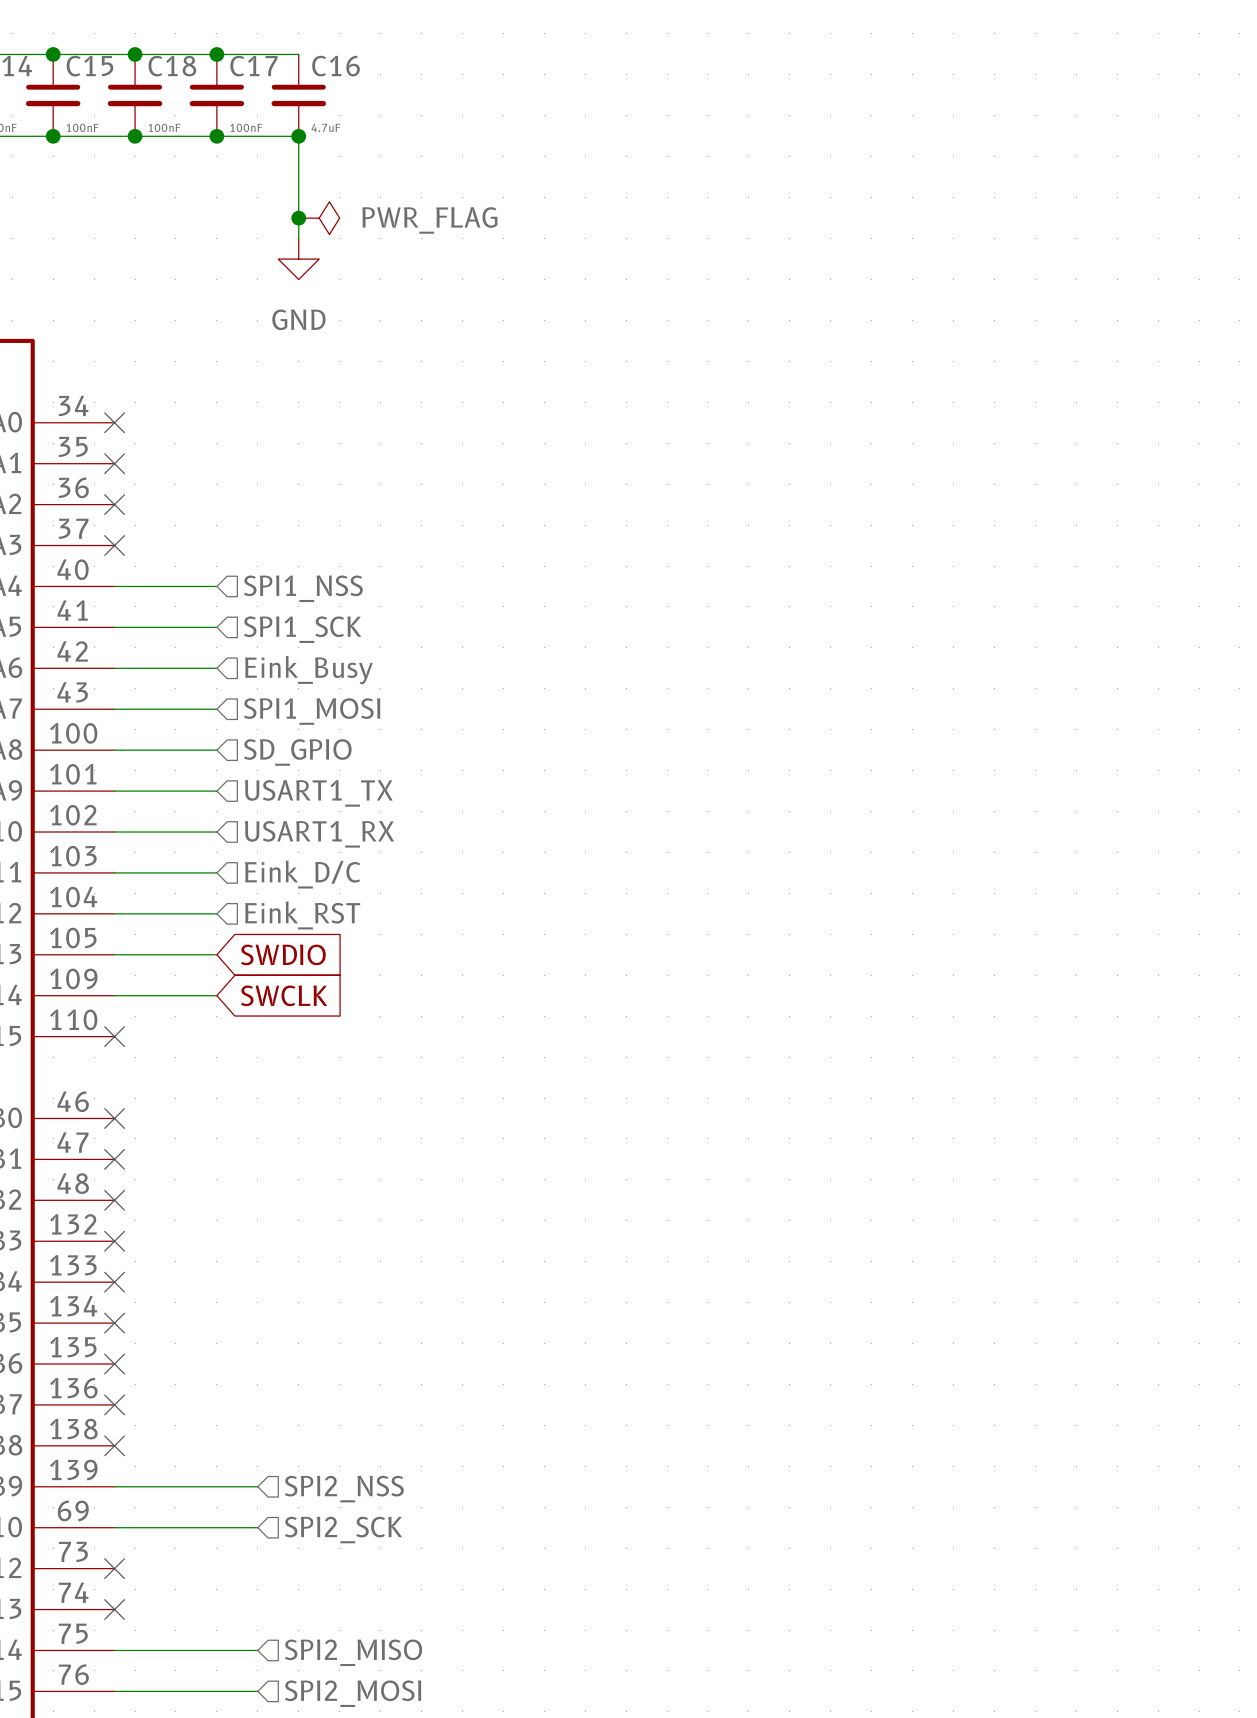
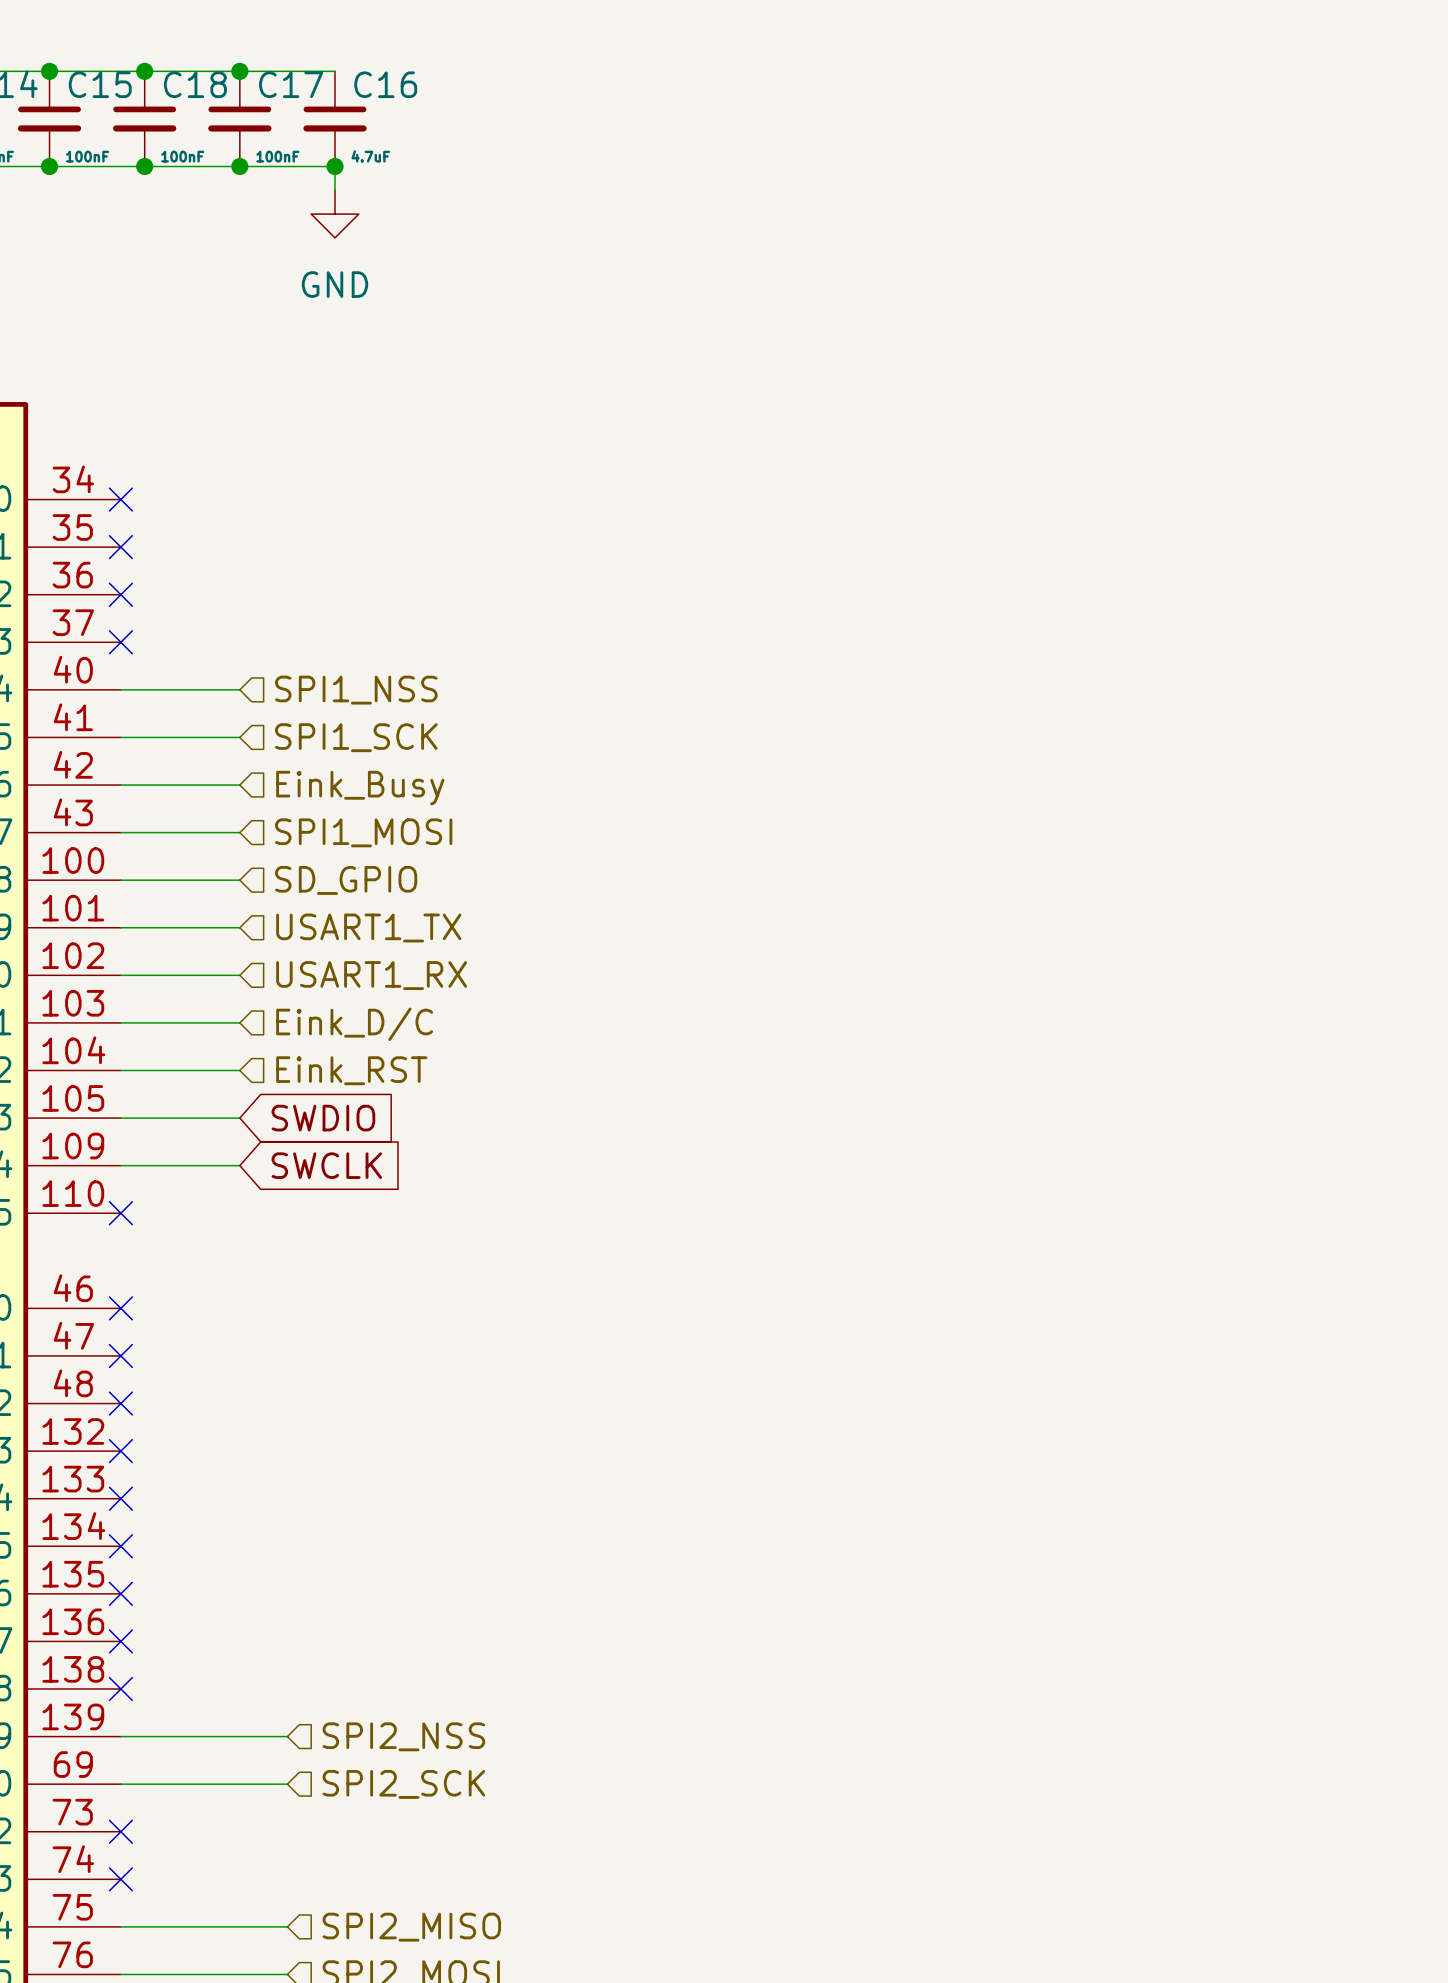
wire: (298, 156) (298, 238) -> none
junction: (298, 218) -> none
power symbol: PWR_FLAG (319, 218) -> none
power symbol position: GND (298, 259) -> GND (335, 214)

